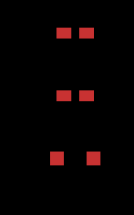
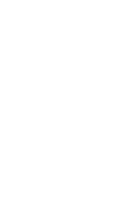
part: (75, 33) -> none
part: (75, 95) -> none
part: (75, 158) -> none

